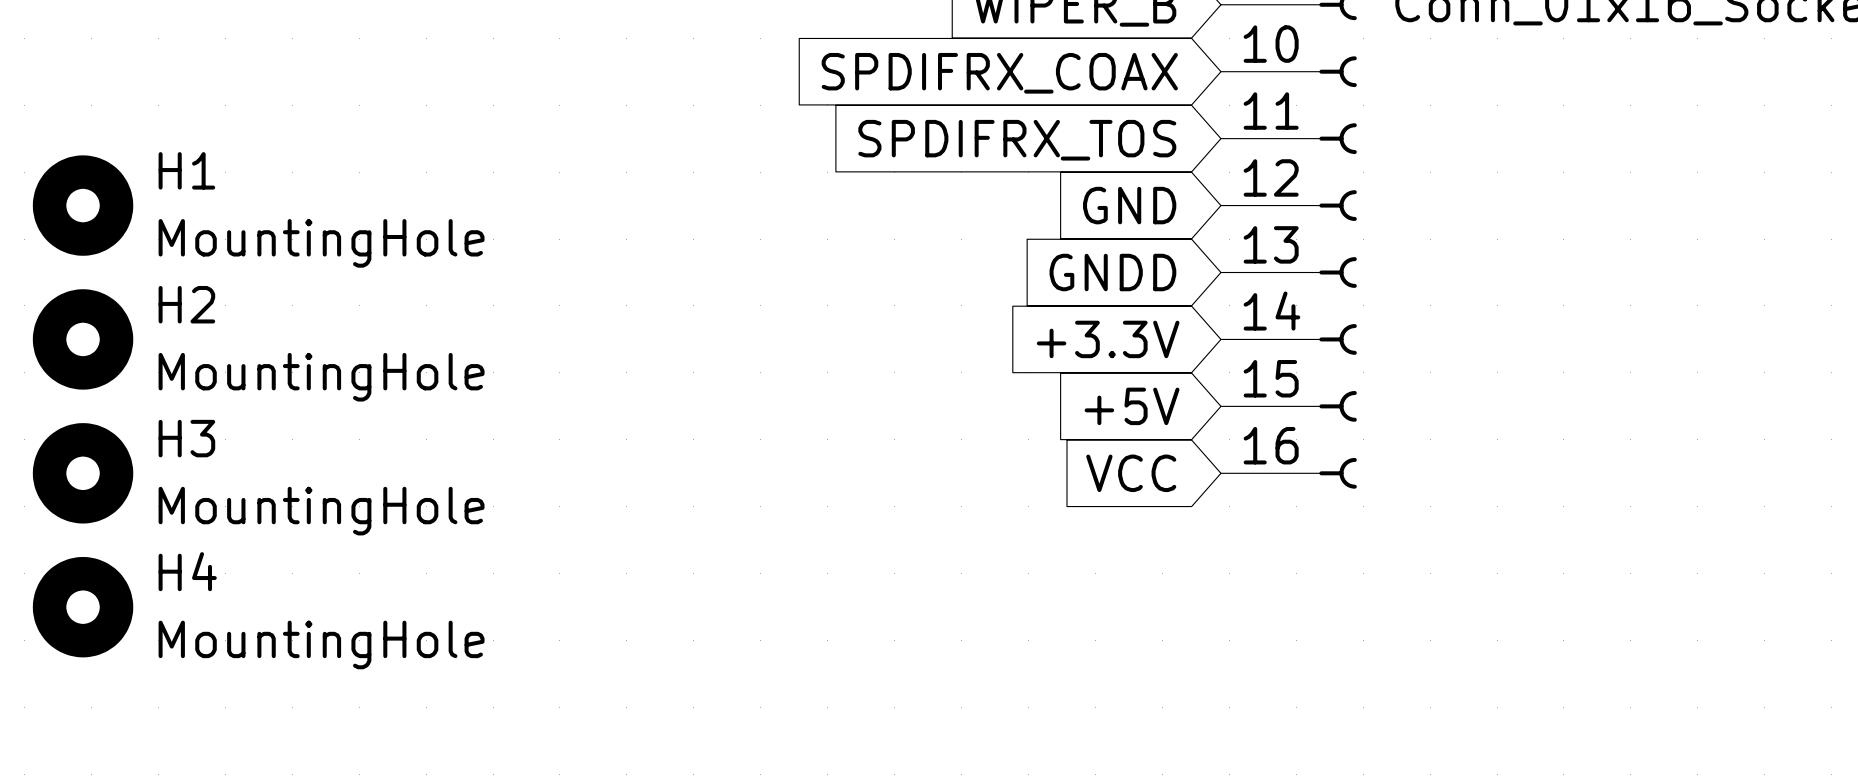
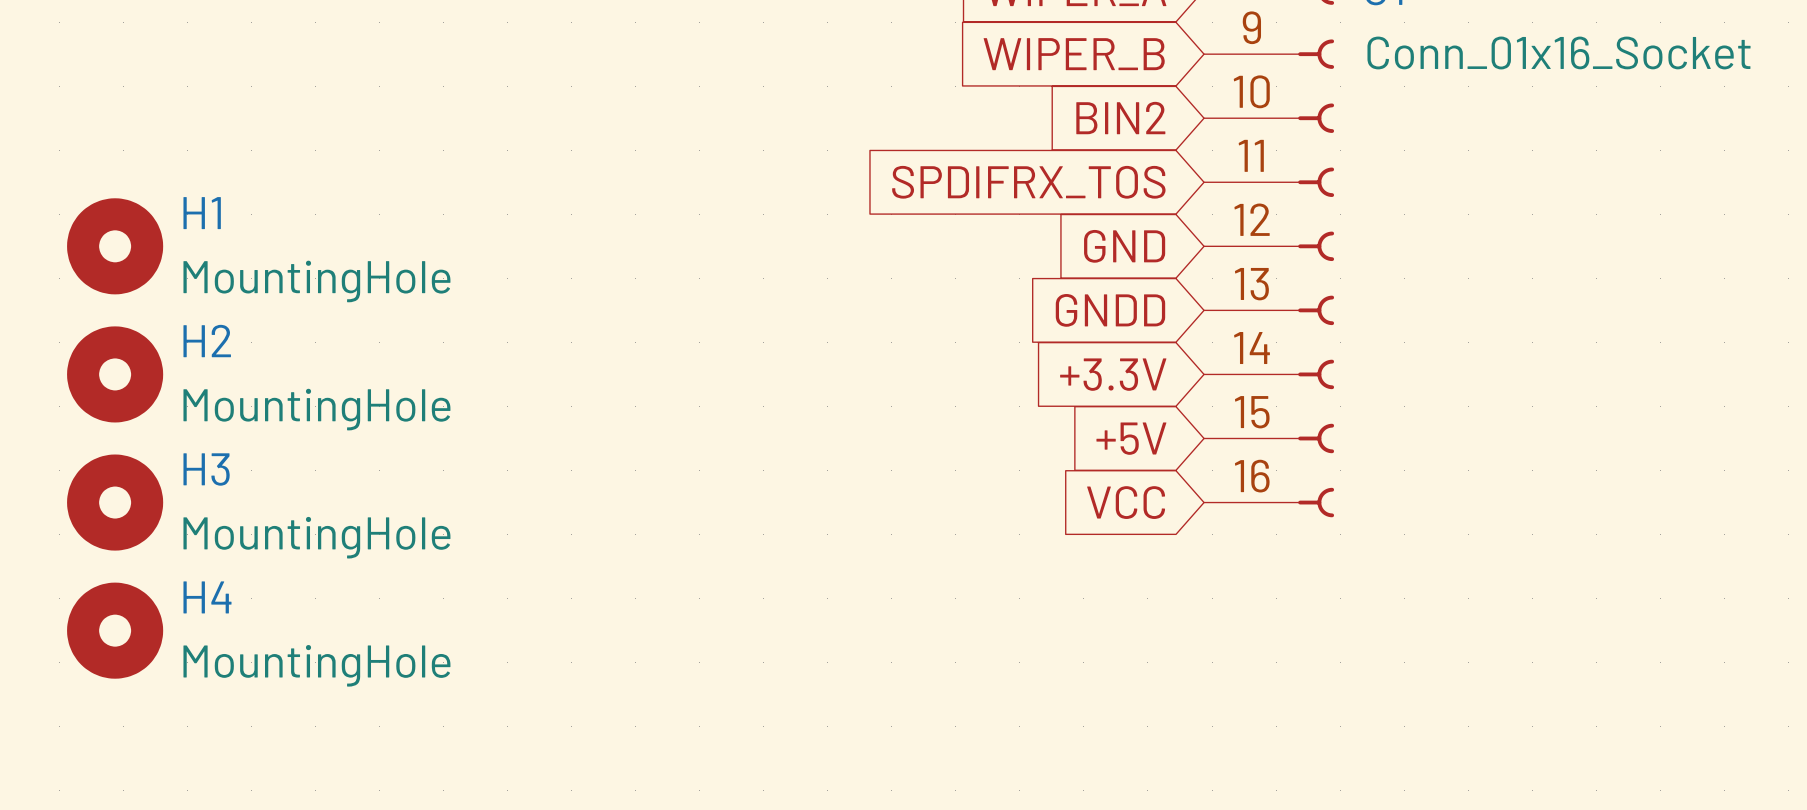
global label: SPDIFRX_COAX (999, 73) -> BIN2 (1120, 118)

